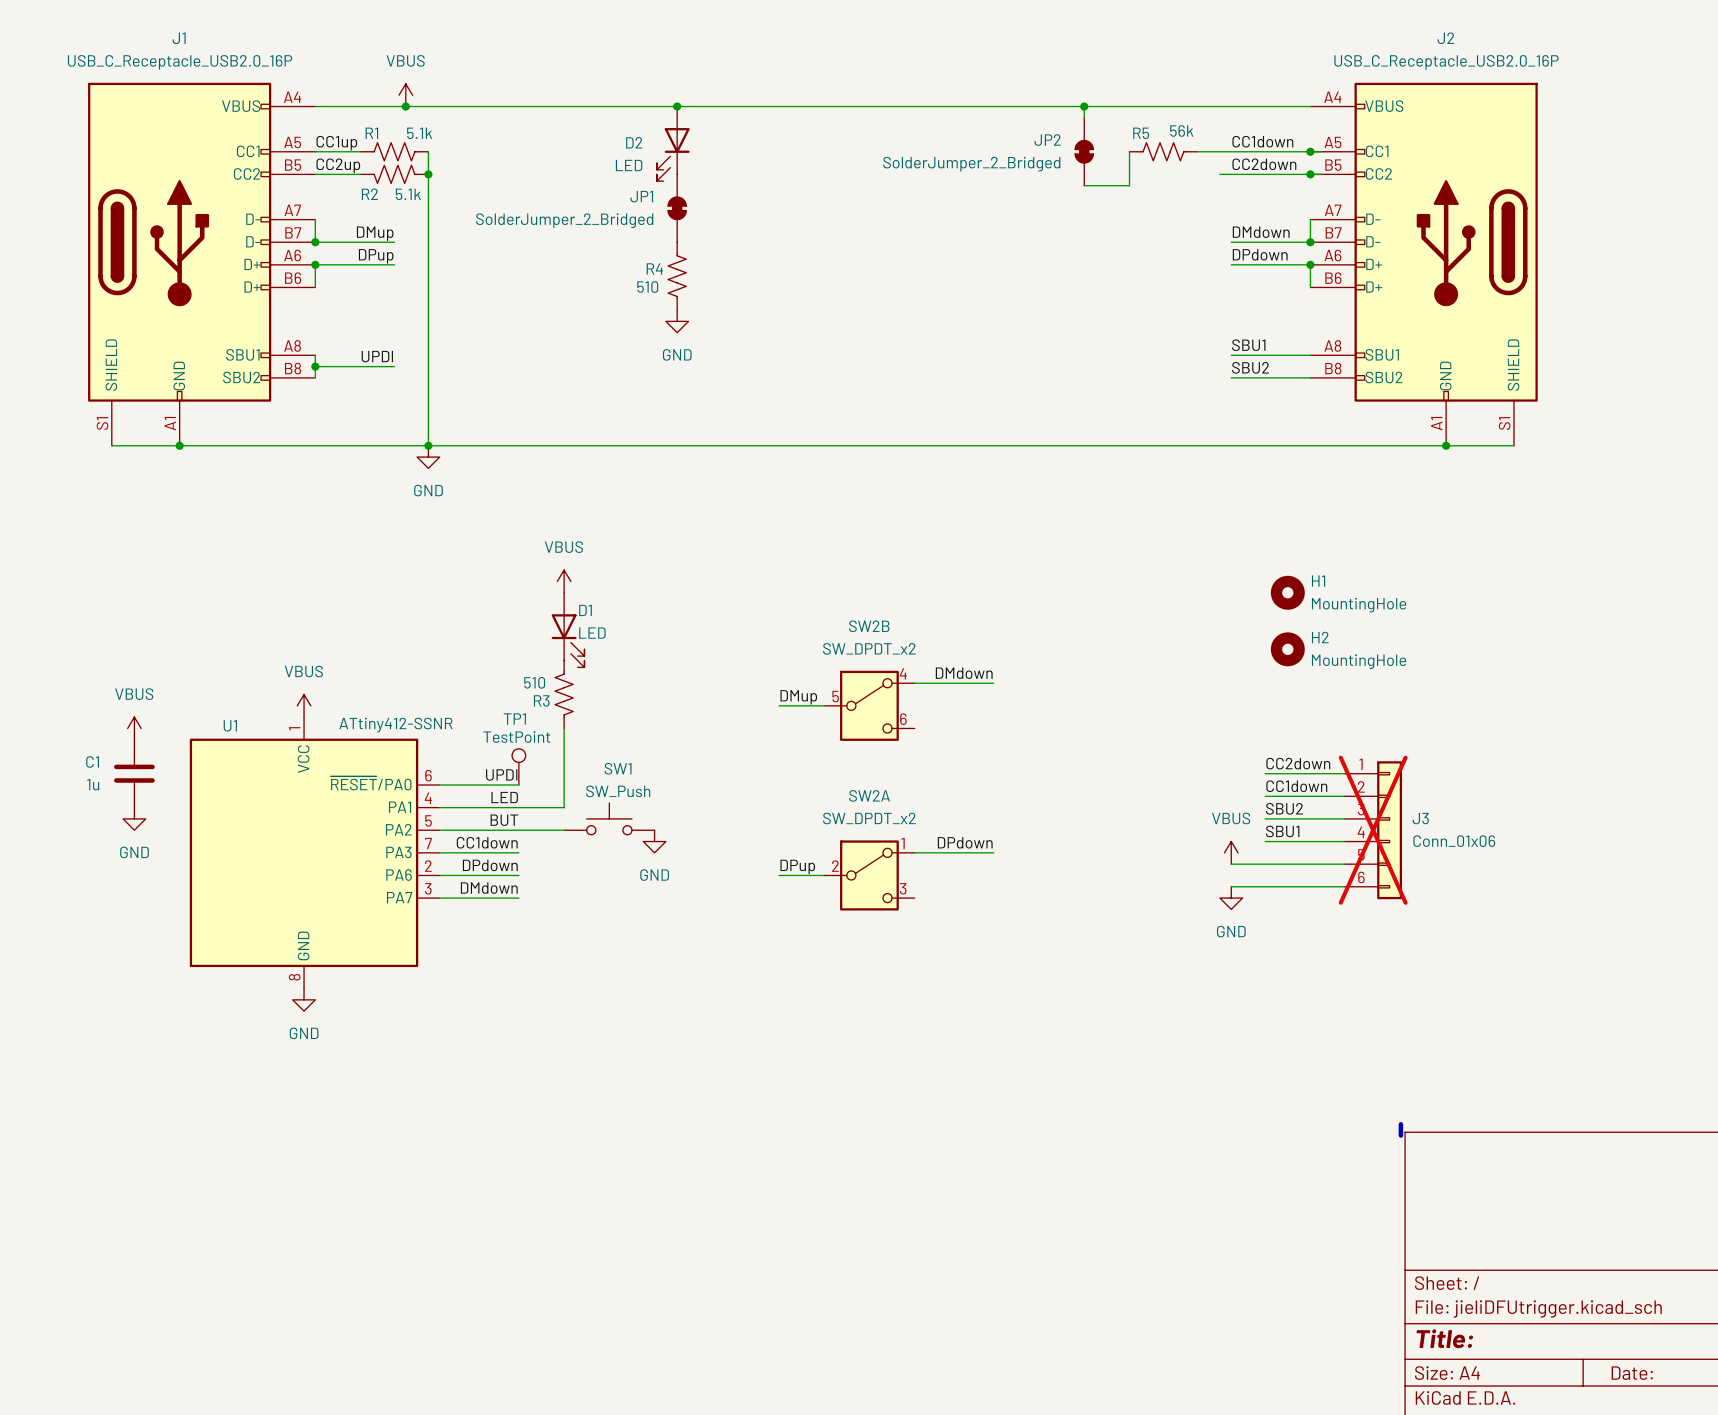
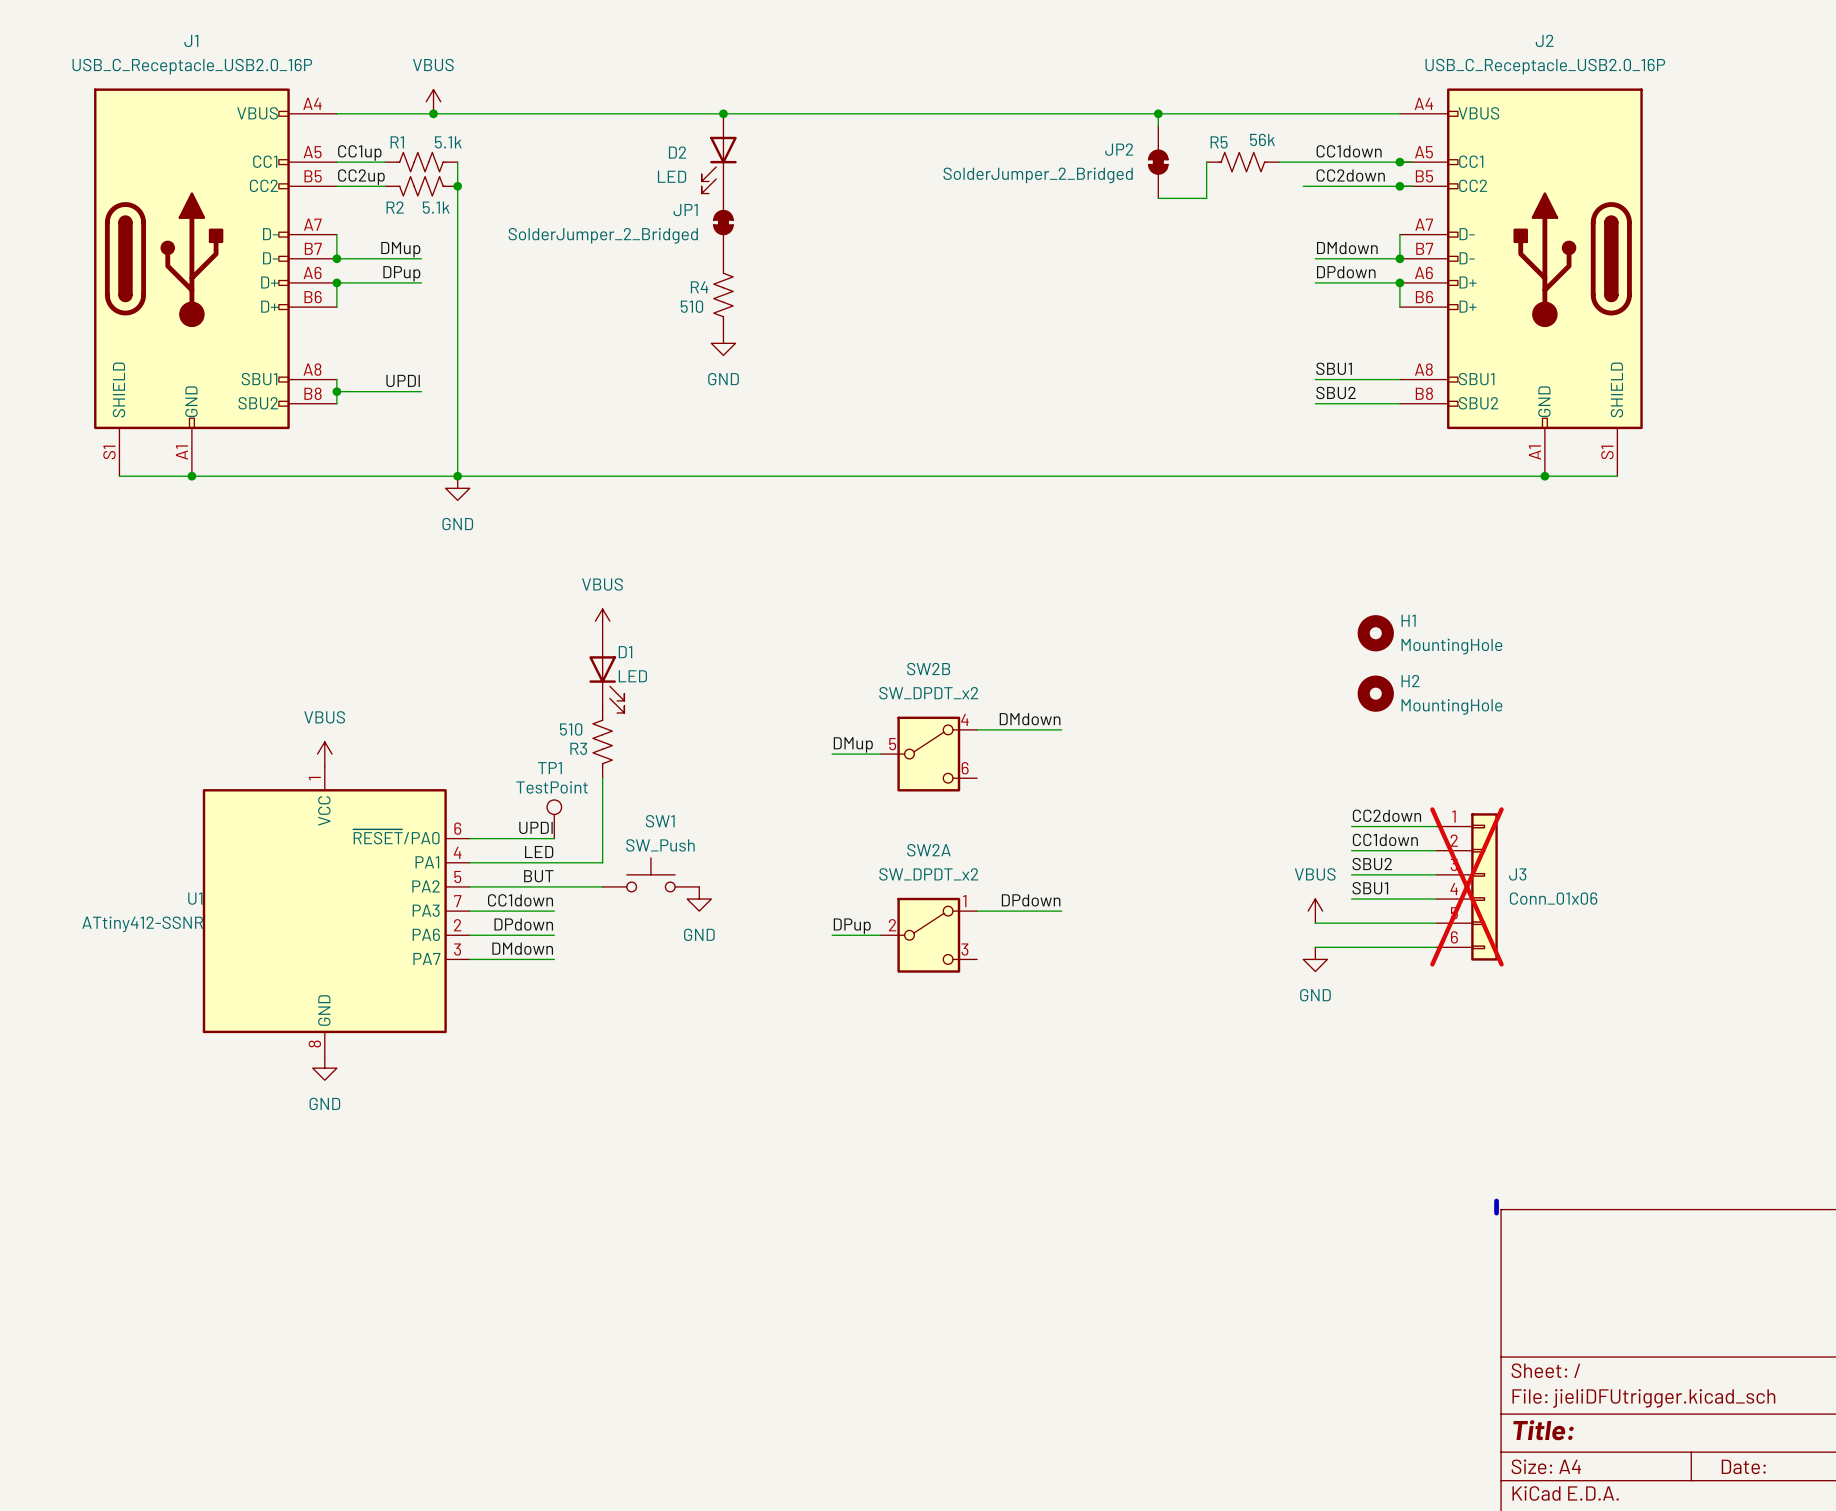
U1 name position: U1 (230, 725) -> U1 (195, 898)
U1 value position: ATtiny412-SSNR (395, 725) -> ATtiny412-SSNR (142, 924)
power symbol: VBUS (134, 728) -> none
C1: 1u (134, 773) -> none
power symbol: GND (134, 818) -> none

